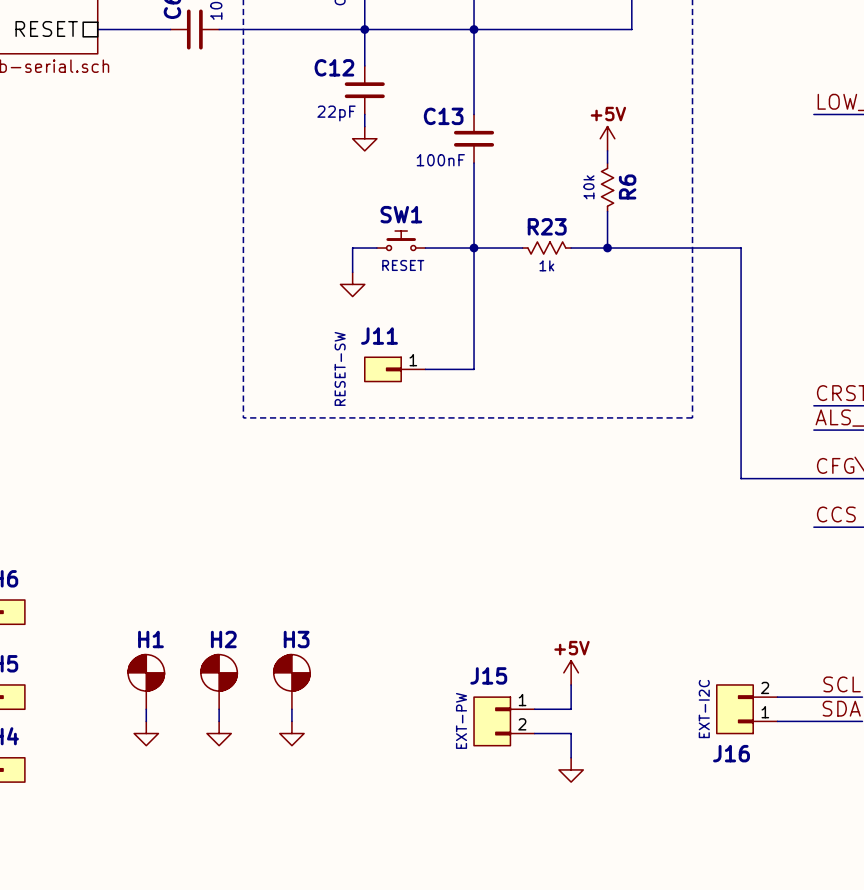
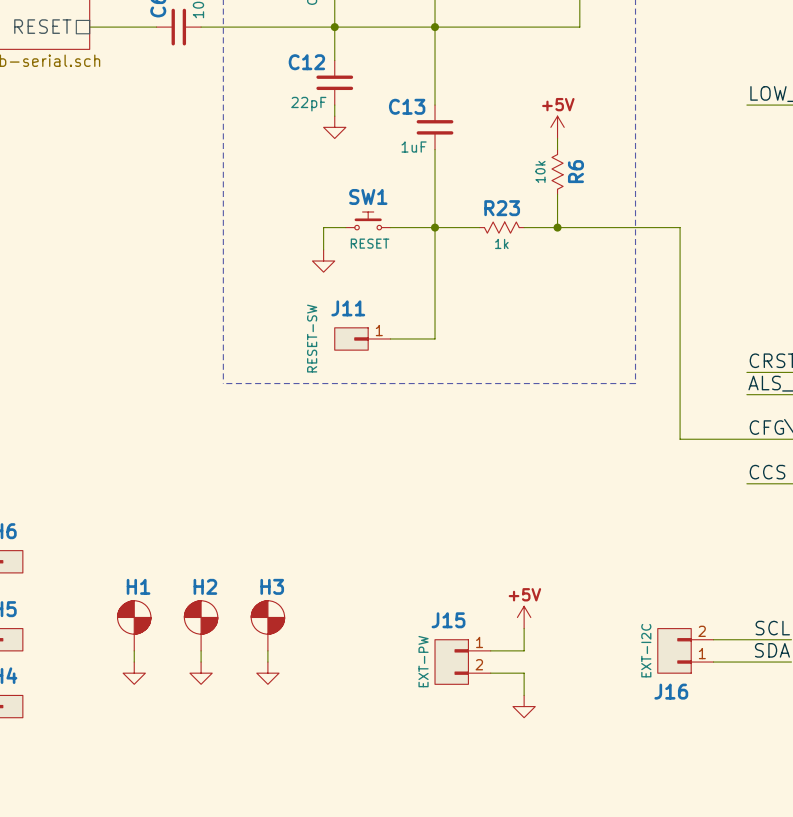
C13 value: 100nF (440, 160) -> 1uF (414, 147)

